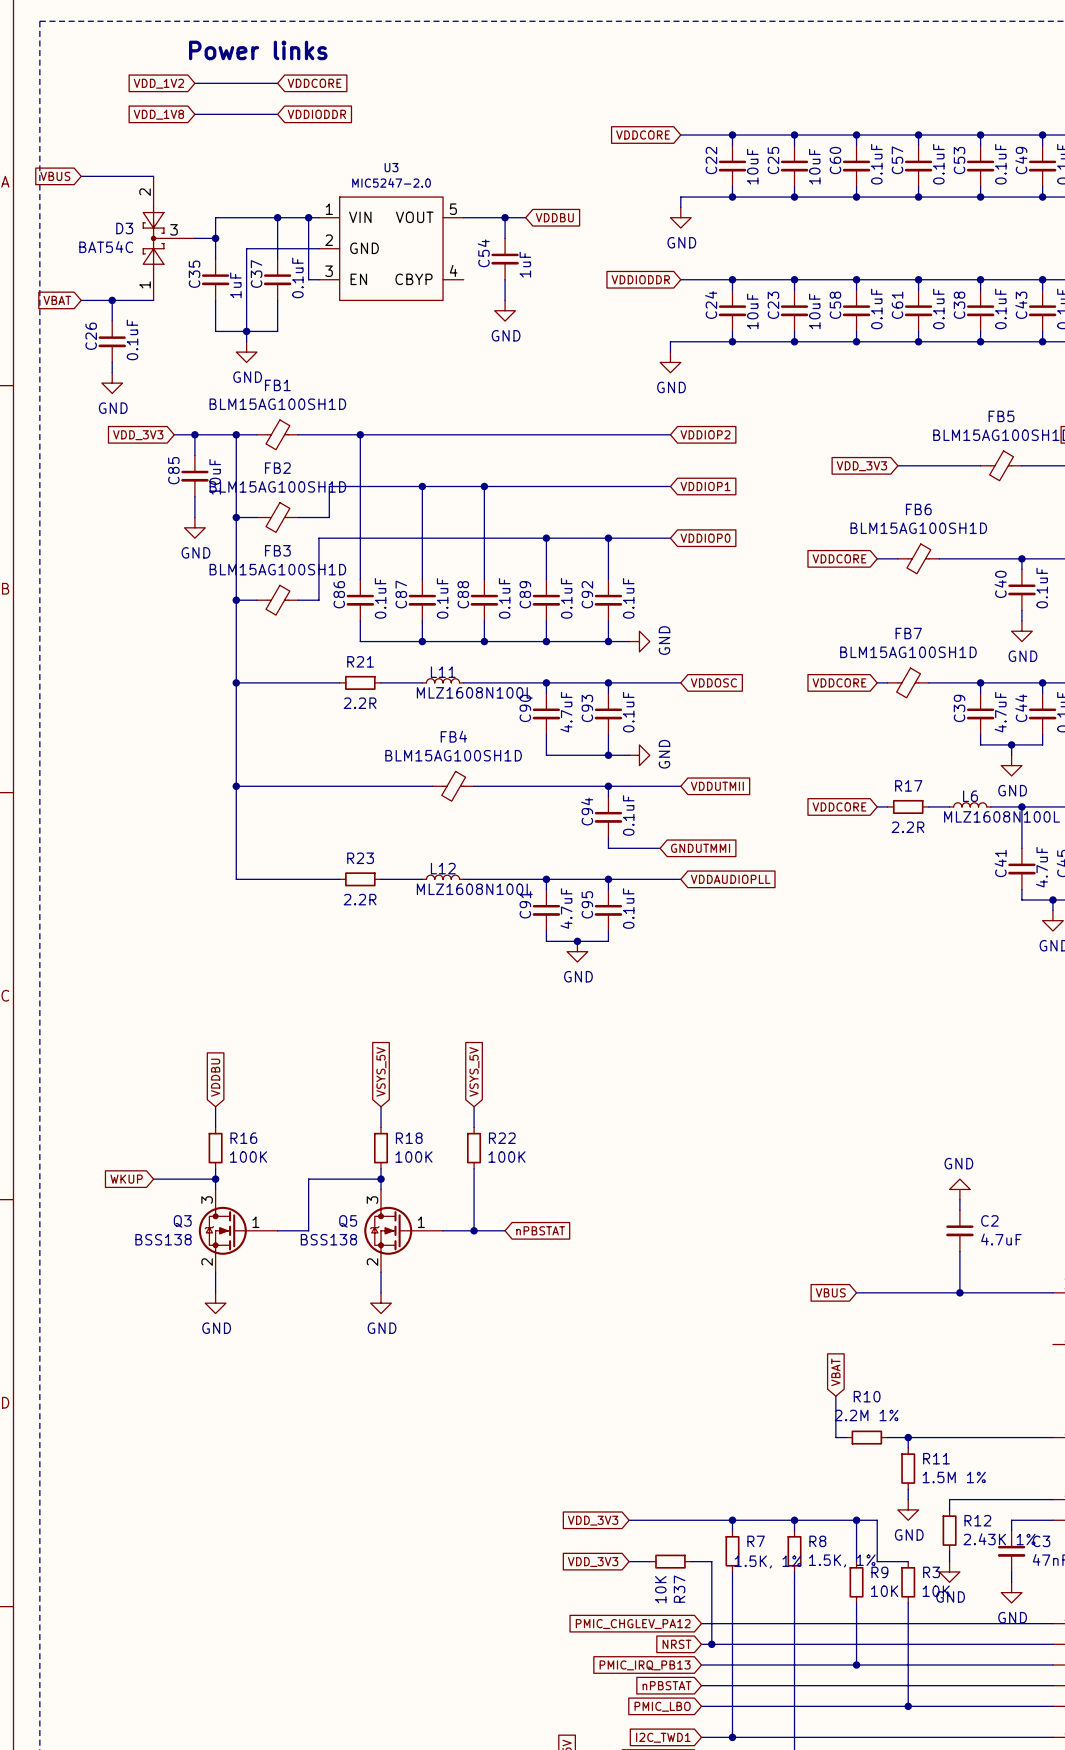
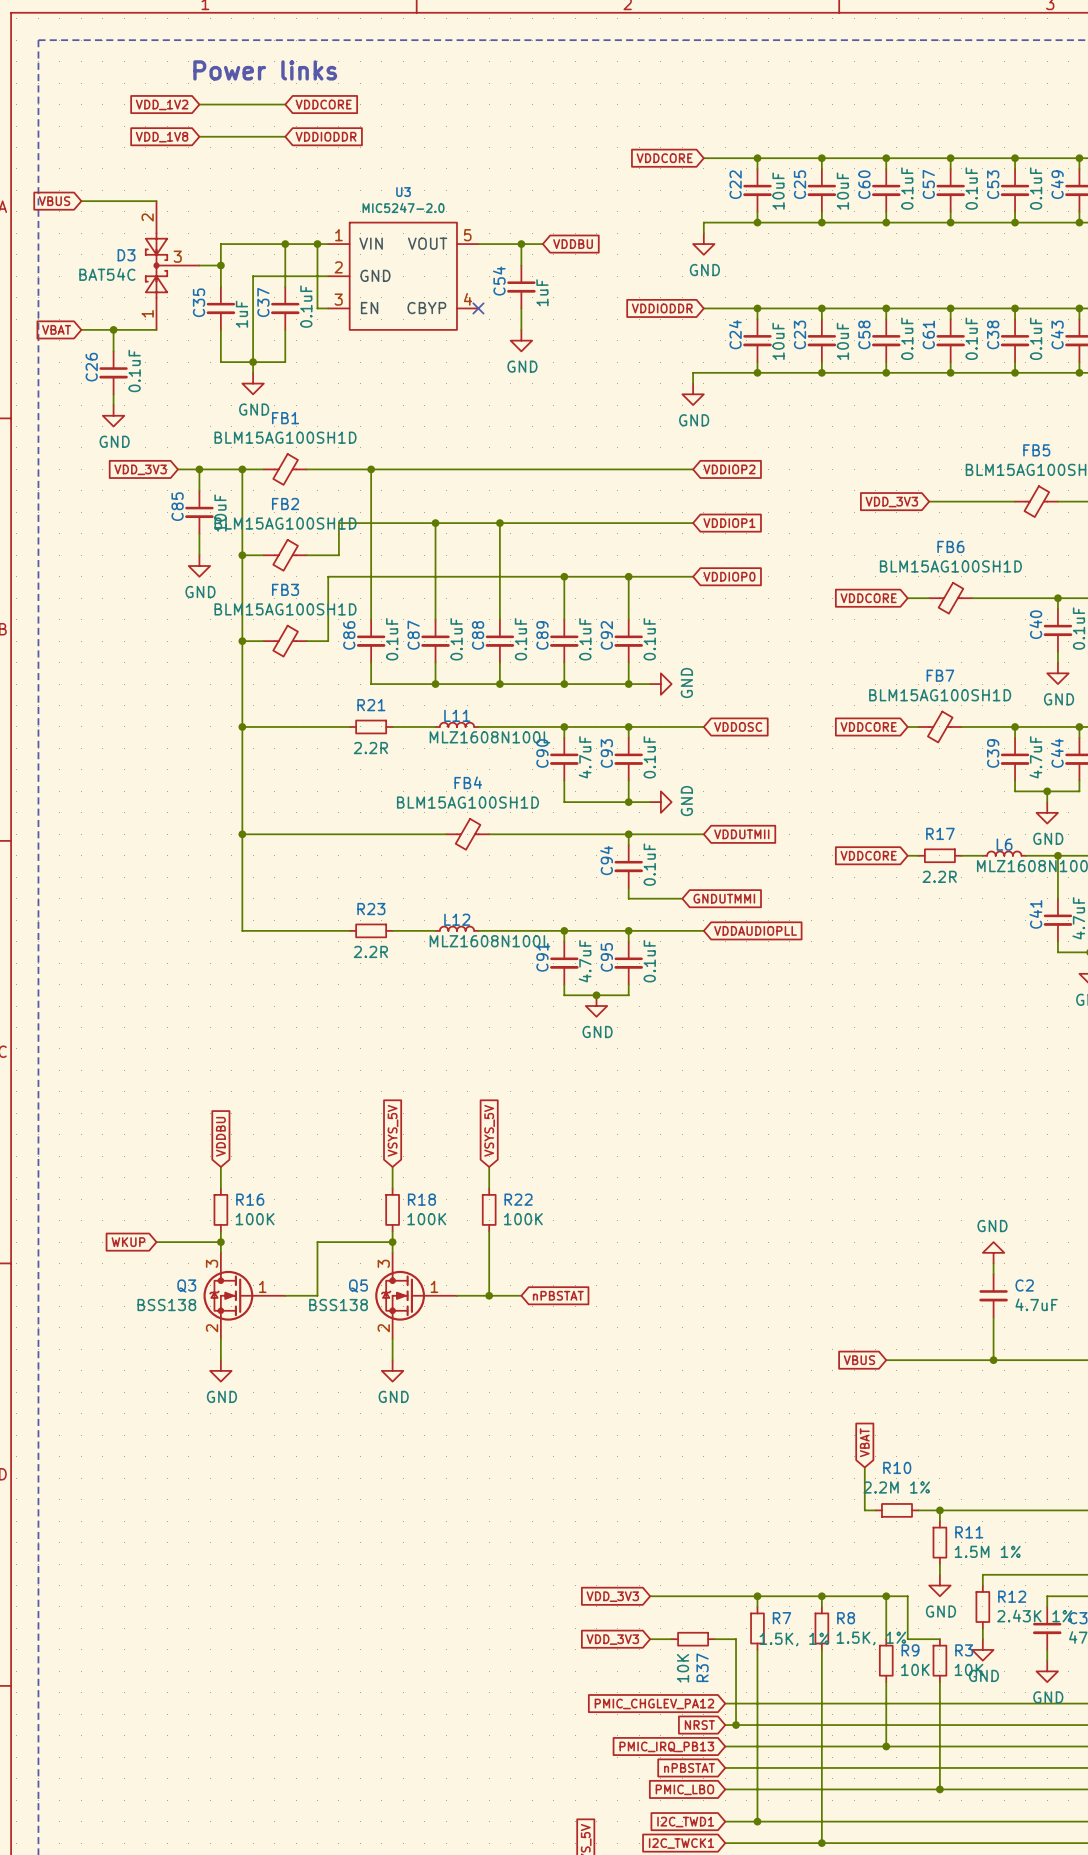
no-connect mark: none -> (478, 308)

